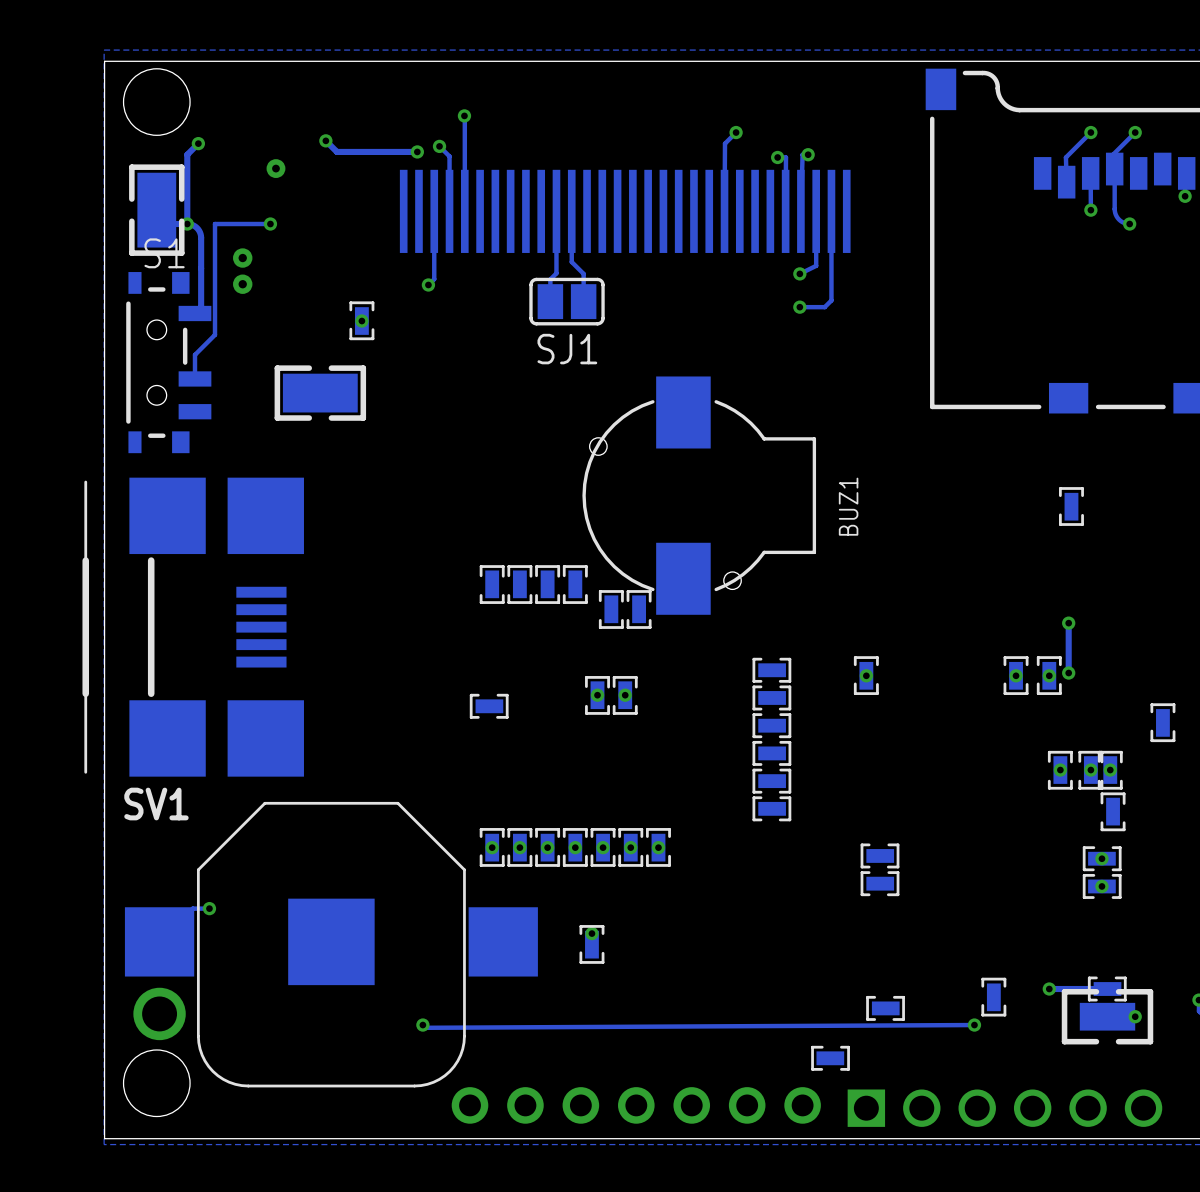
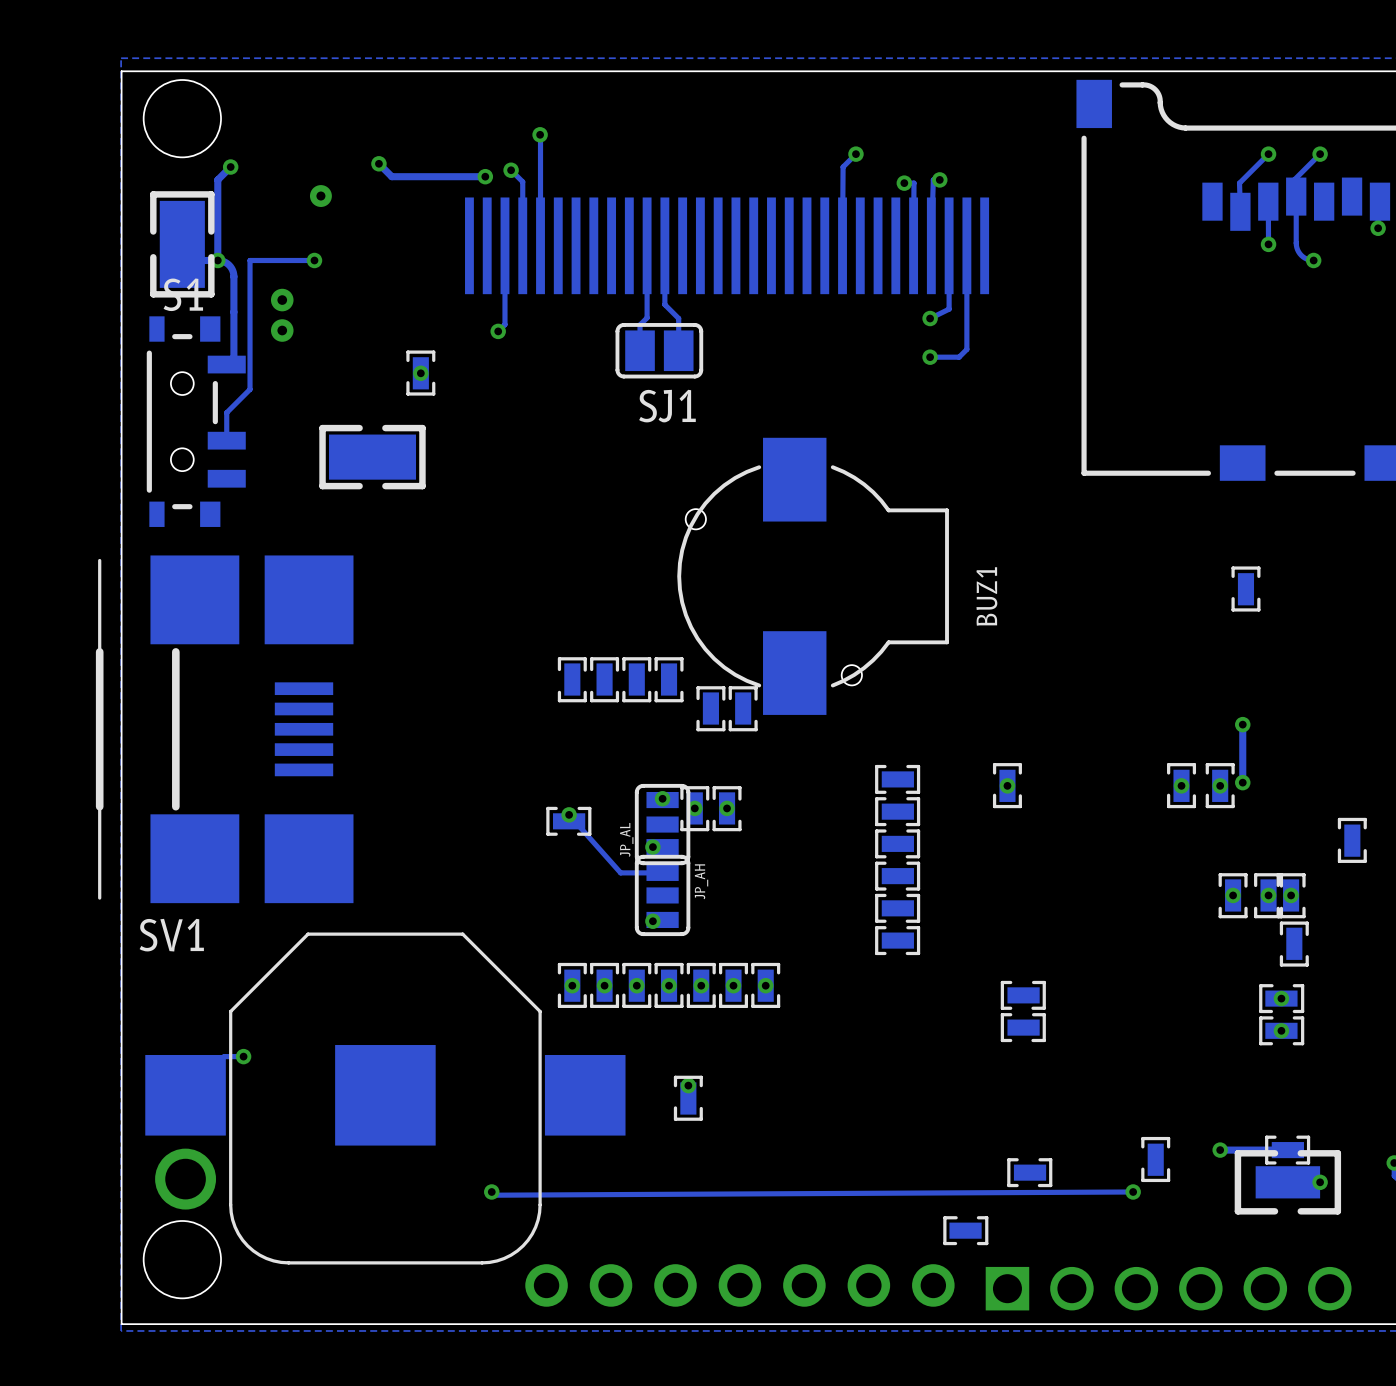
via: none -> (662, 798)
track: none -> (569, 814) (620, 872) (662, 872)
via: none -> (569, 814)
JP_AL: none -> (662, 824)
via: none -> (652, 847)
JP_AH: none -> (662, 895)
via: none -> (652, 921)

